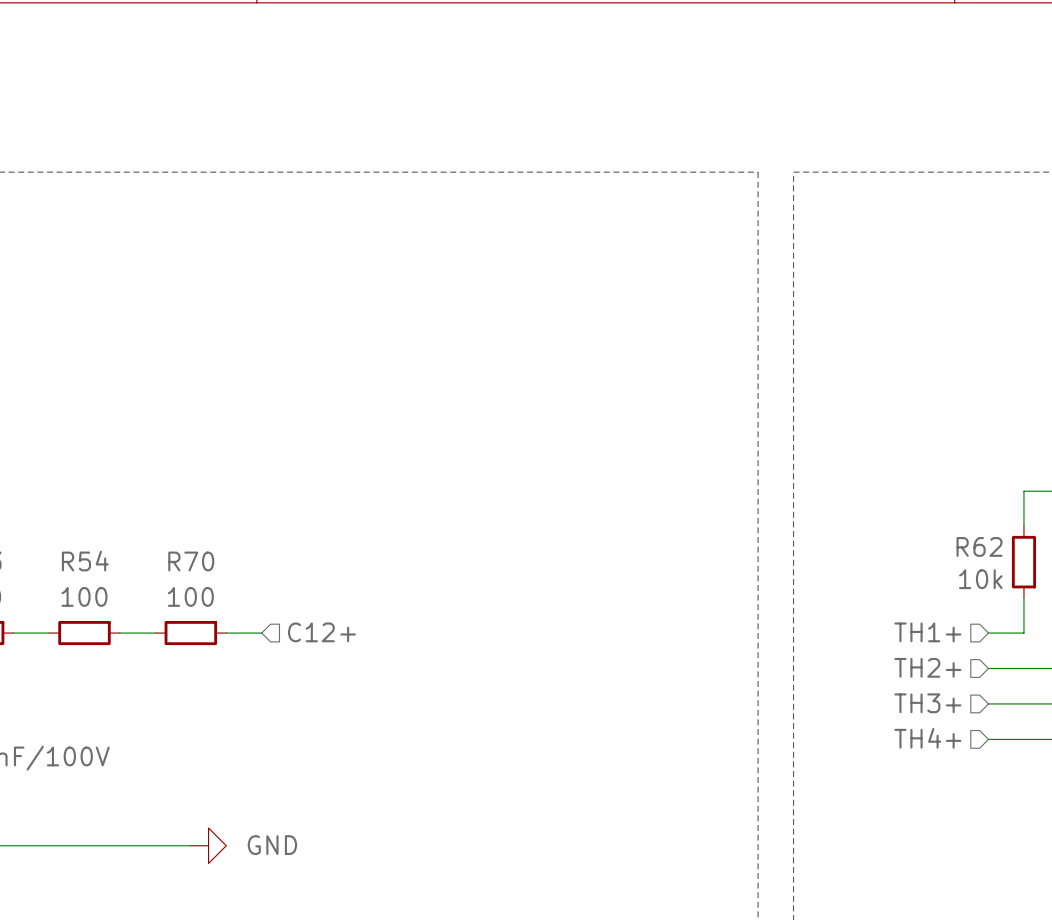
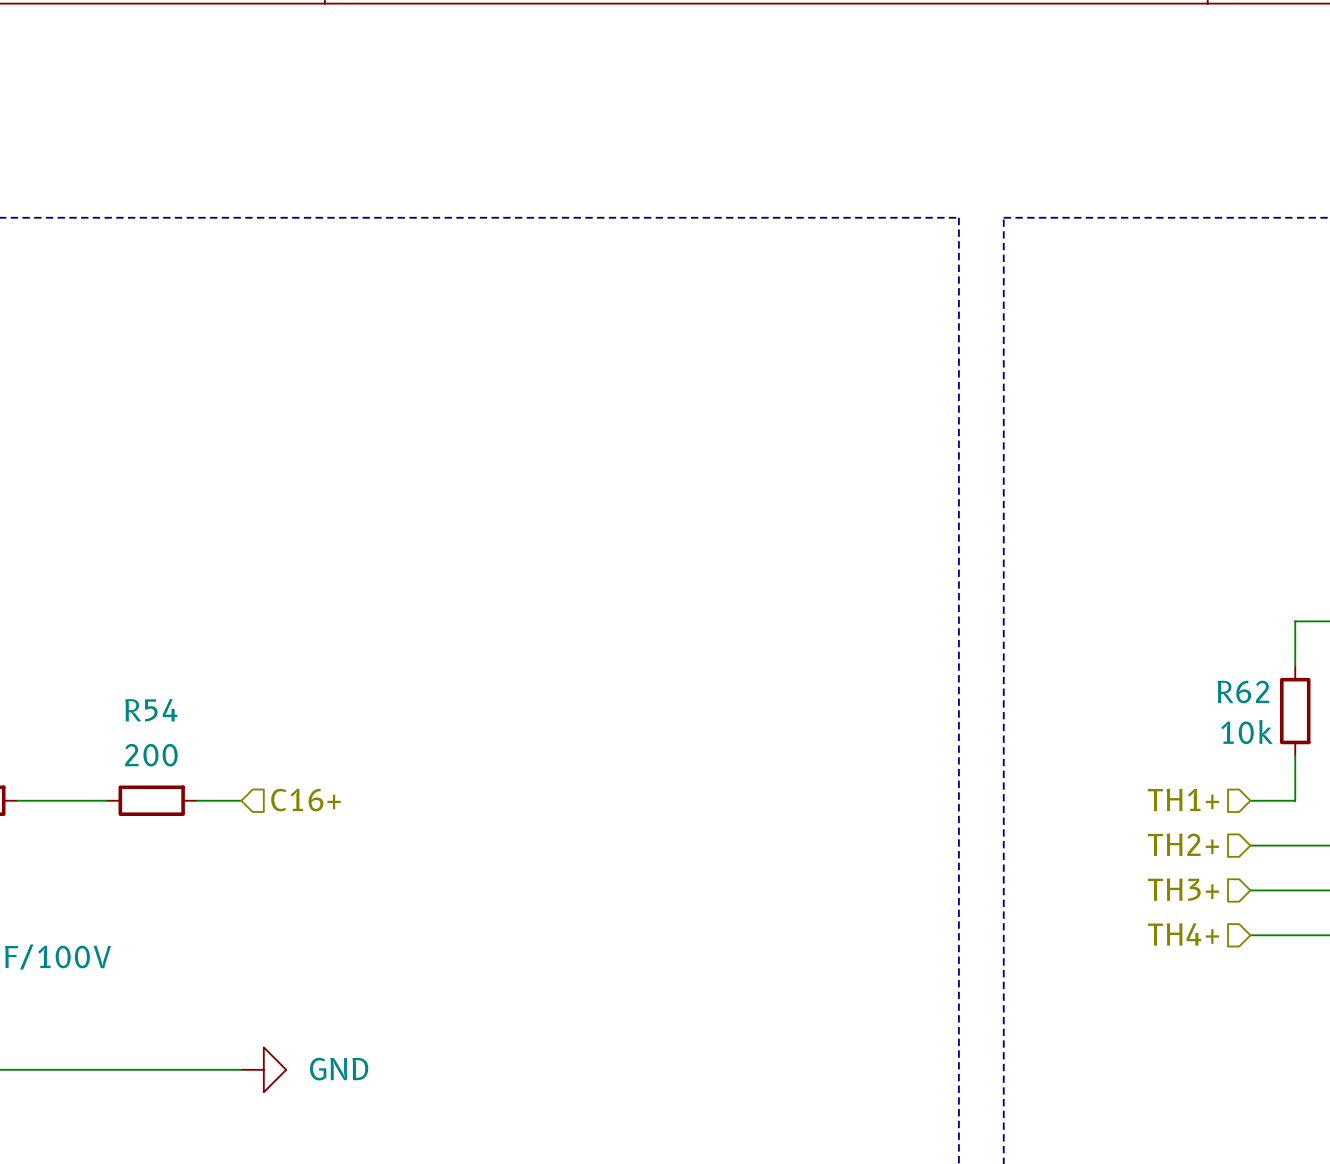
R54 value: 100 (84, 596) -> 200 (151, 755)
hierarchical label: C12+ (321, 632) -> C16+ (305, 800)
R54 position: (84, 633) -> (151, 800)
wire: (119, 633) (155, 633) -> (241, 800) (196, 800)
R70: 100 (190, 633) -> none
wire: (226, 633) (261, 633) -> (62, 800) (106, 800)

